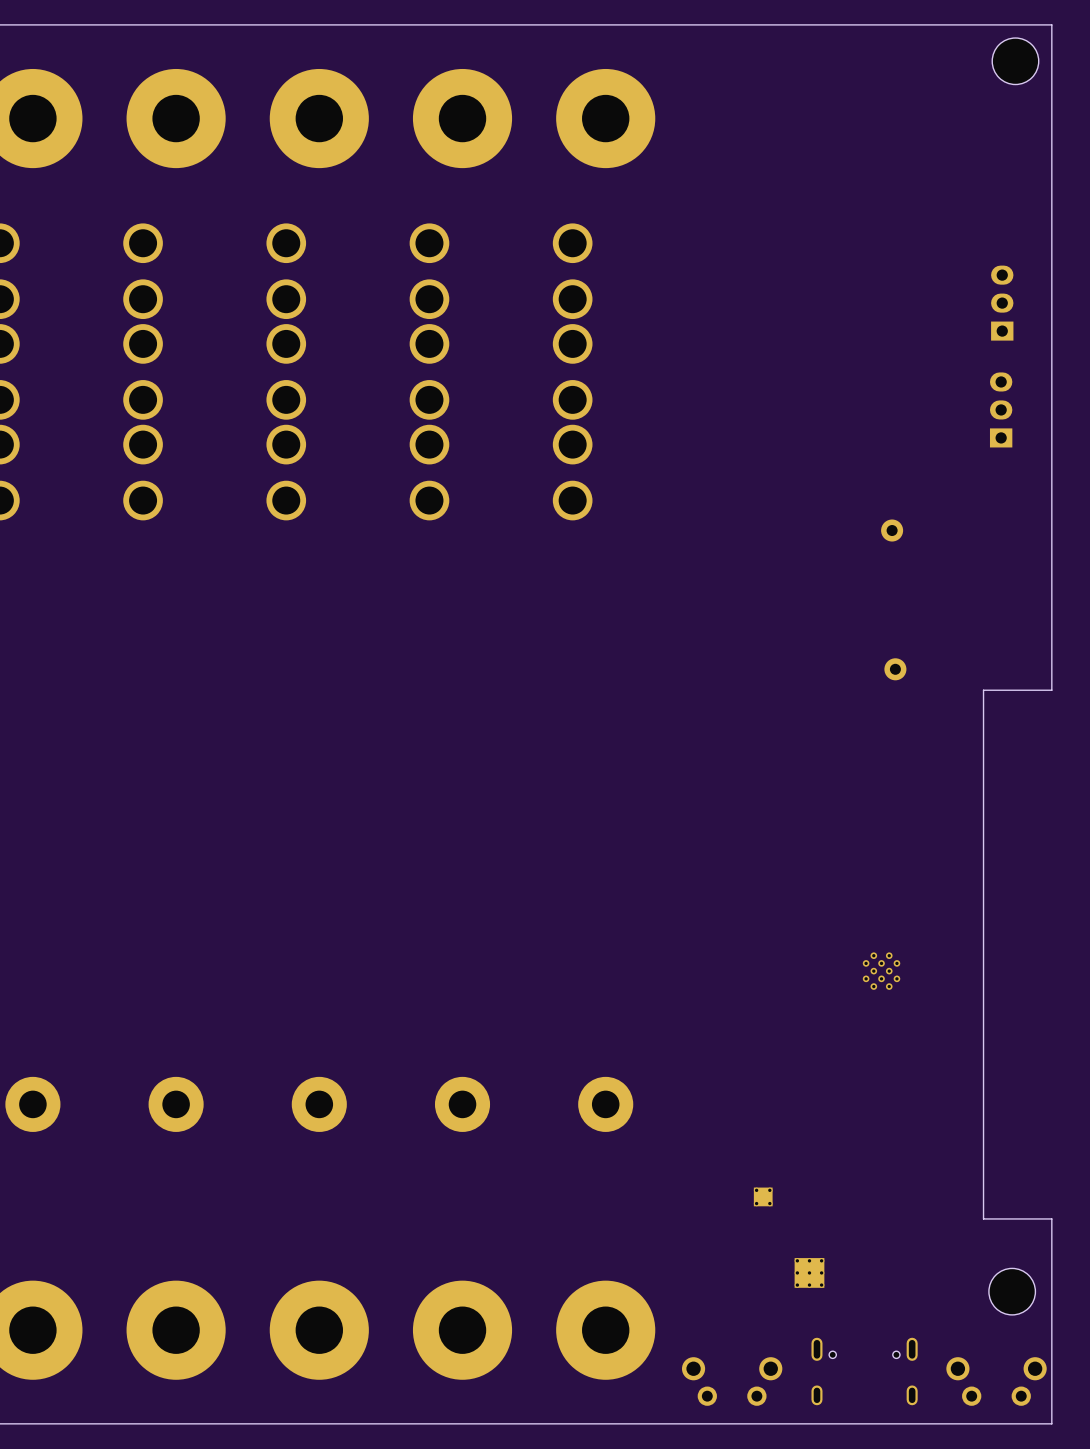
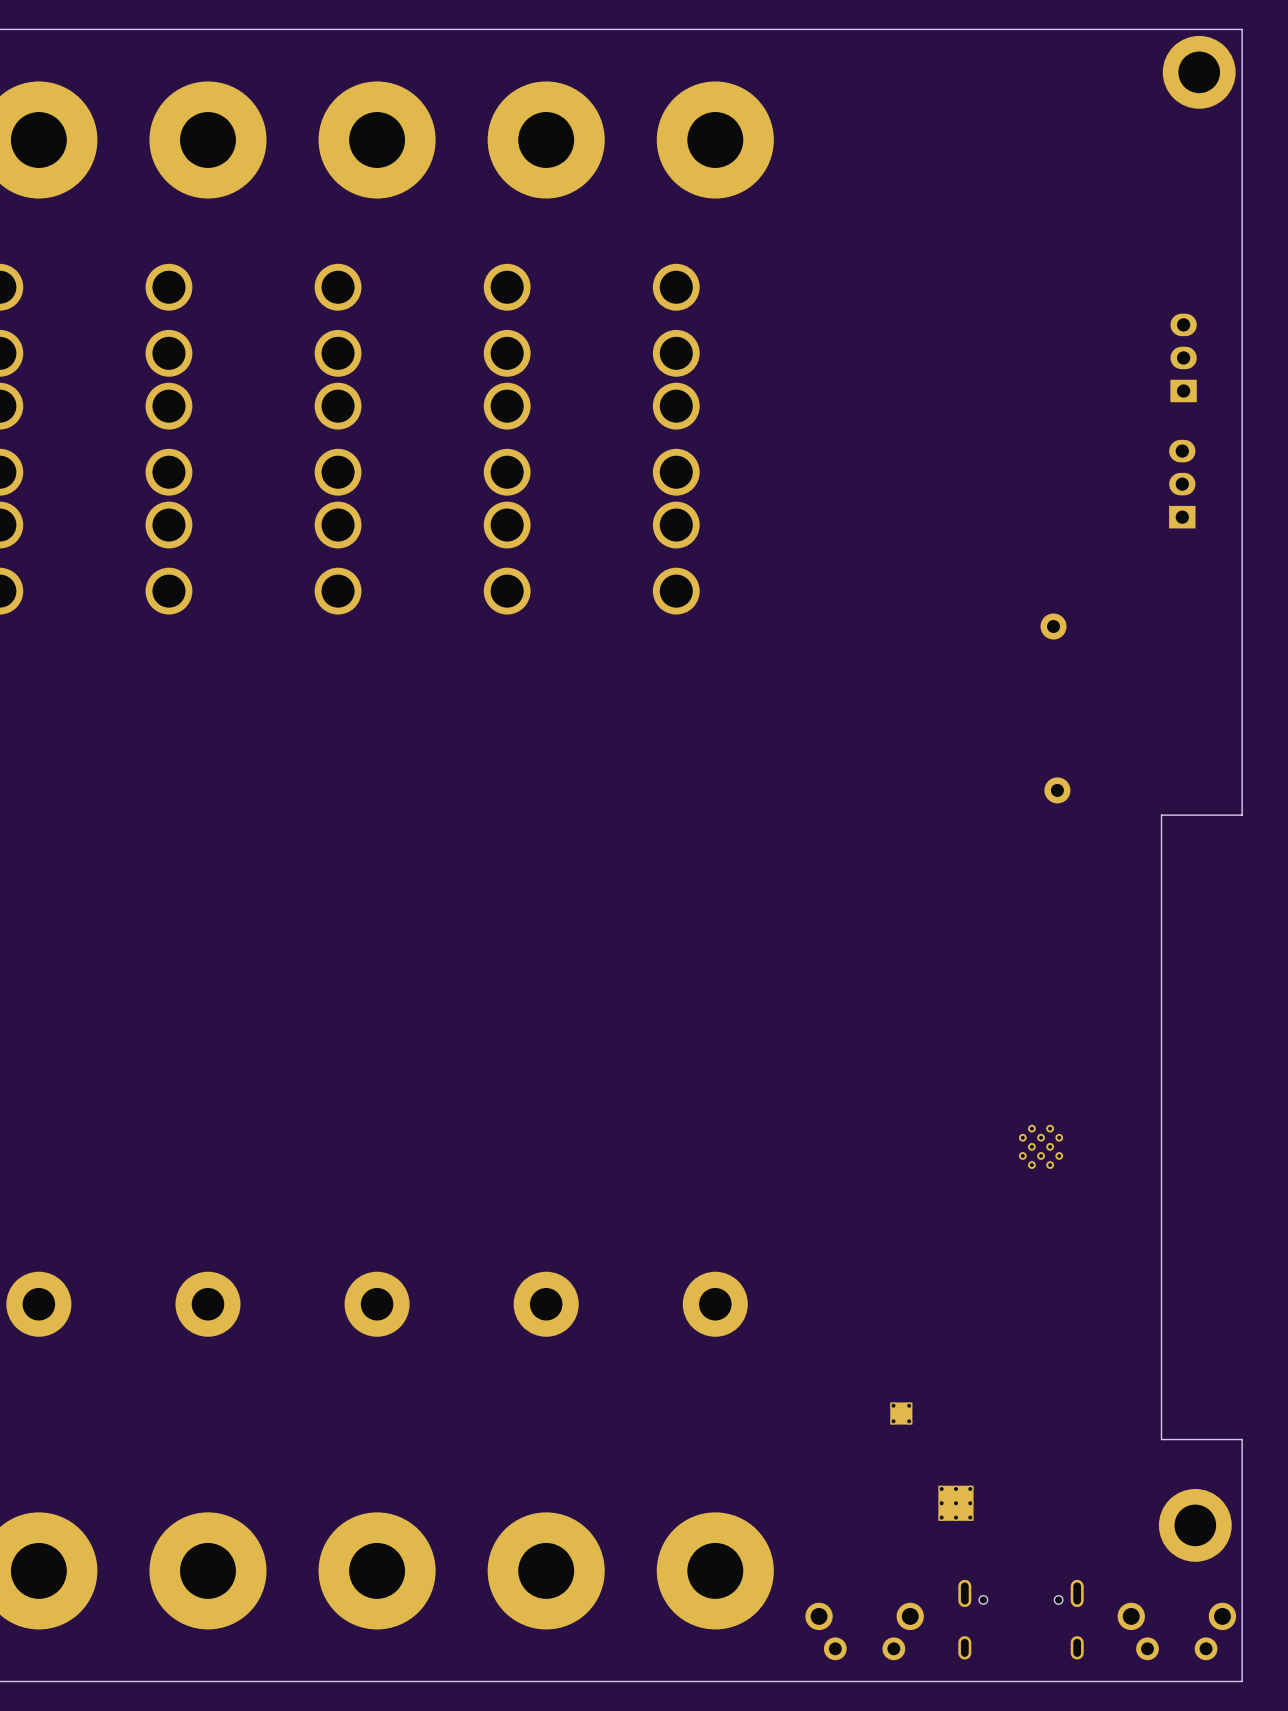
part footprint: [992, 38, 1039, 85] -> [1162, 35, 1236, 109]
part footprint: [988, 1268, 1036, 1315] -> [1158, 1488, 1232, 1562]

